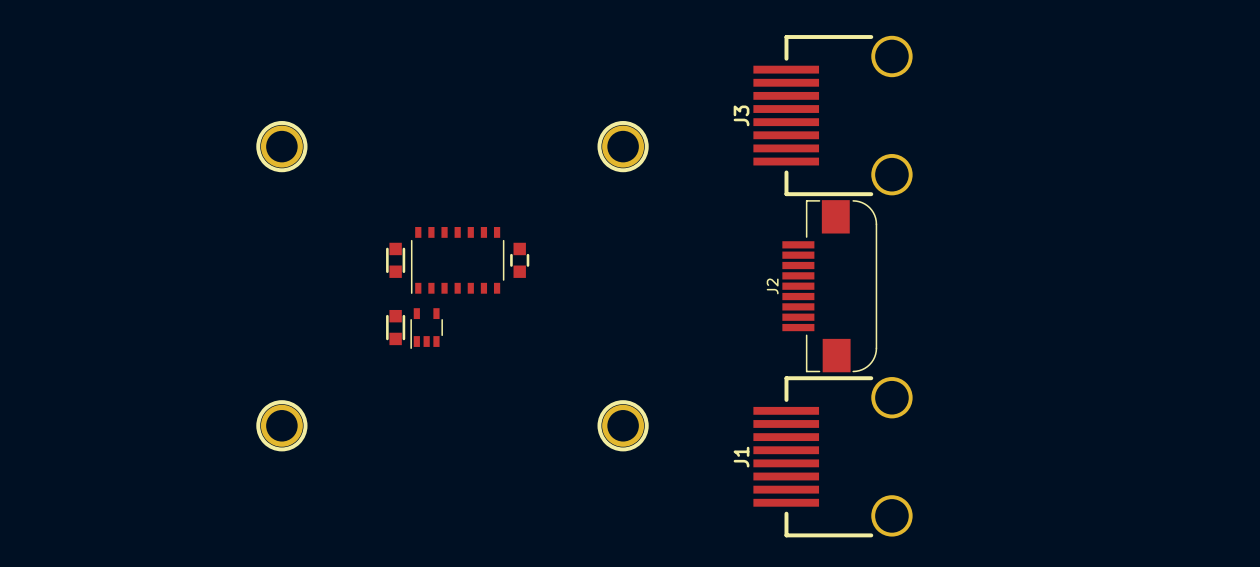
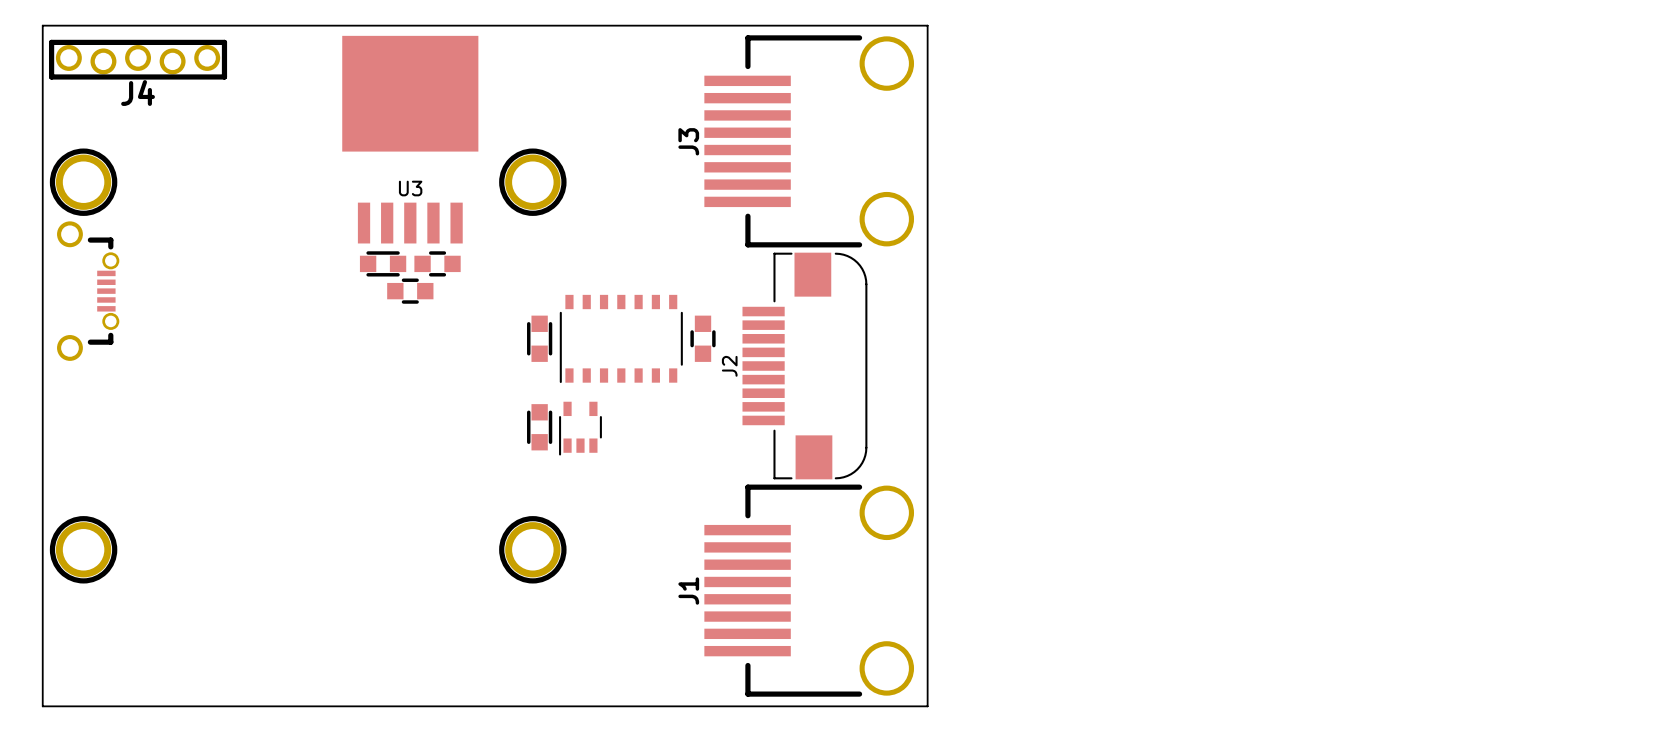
board edge: none -> (42, 25) (927, 25) (927, 706) (42, 706) (42, 25)
J4: none -> (138, 59)
U3: none -> (410, 139)
J3 position: (833, 115) -> (809, 141)
part: none -> (83, 182)
part position: (281, 146) -> (532, 182)
part: (623, 146) -> none
part: none -> (383, 263)
part: none -> (437, 263)
part: none -> (88, 291)
part: none -> (410, 291)
J2 position: (829, 286) -> (804, 366)
part: none -> (83, 549)
part position: (281, 425) -> (532, 549)
part: (623, 425) -> none
J1 position: (833, 456) -> (809, 590)

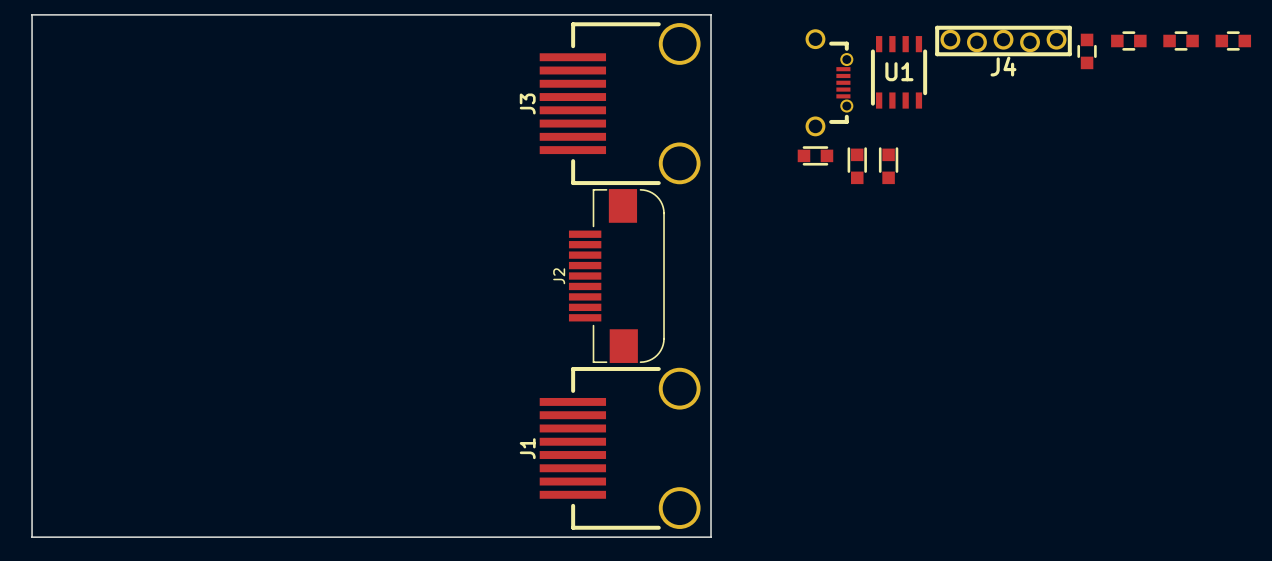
J4 position: (138, 59) -> (1003, 40)
part: none -> (1128, 40)
part: none -> (1181, 40)
part: none -> (1233, 40)
part: none -> (1087, 51)
U1: none -> (899, 72)
part: none -> (829, 82)
U3: (410, 139) -> none
part: (83, 182) -> none
part: (532, 182) -> none
part: none -> (815, 155)
part: none -> (857, 165)
part: none -> (888, 165)
part: (383, 263) -> none
part: (437, 263) -> none
part: (88, 291) -> none
part: (410, 291) -> none
part: (539, 338) -> none
part: (621, 338) -> none
part: (703, 338) -> none
part: (539, 427) -> none
part: (580, 428) -> none
part: (83, 549) -> none
part: (532, 549) -> none

